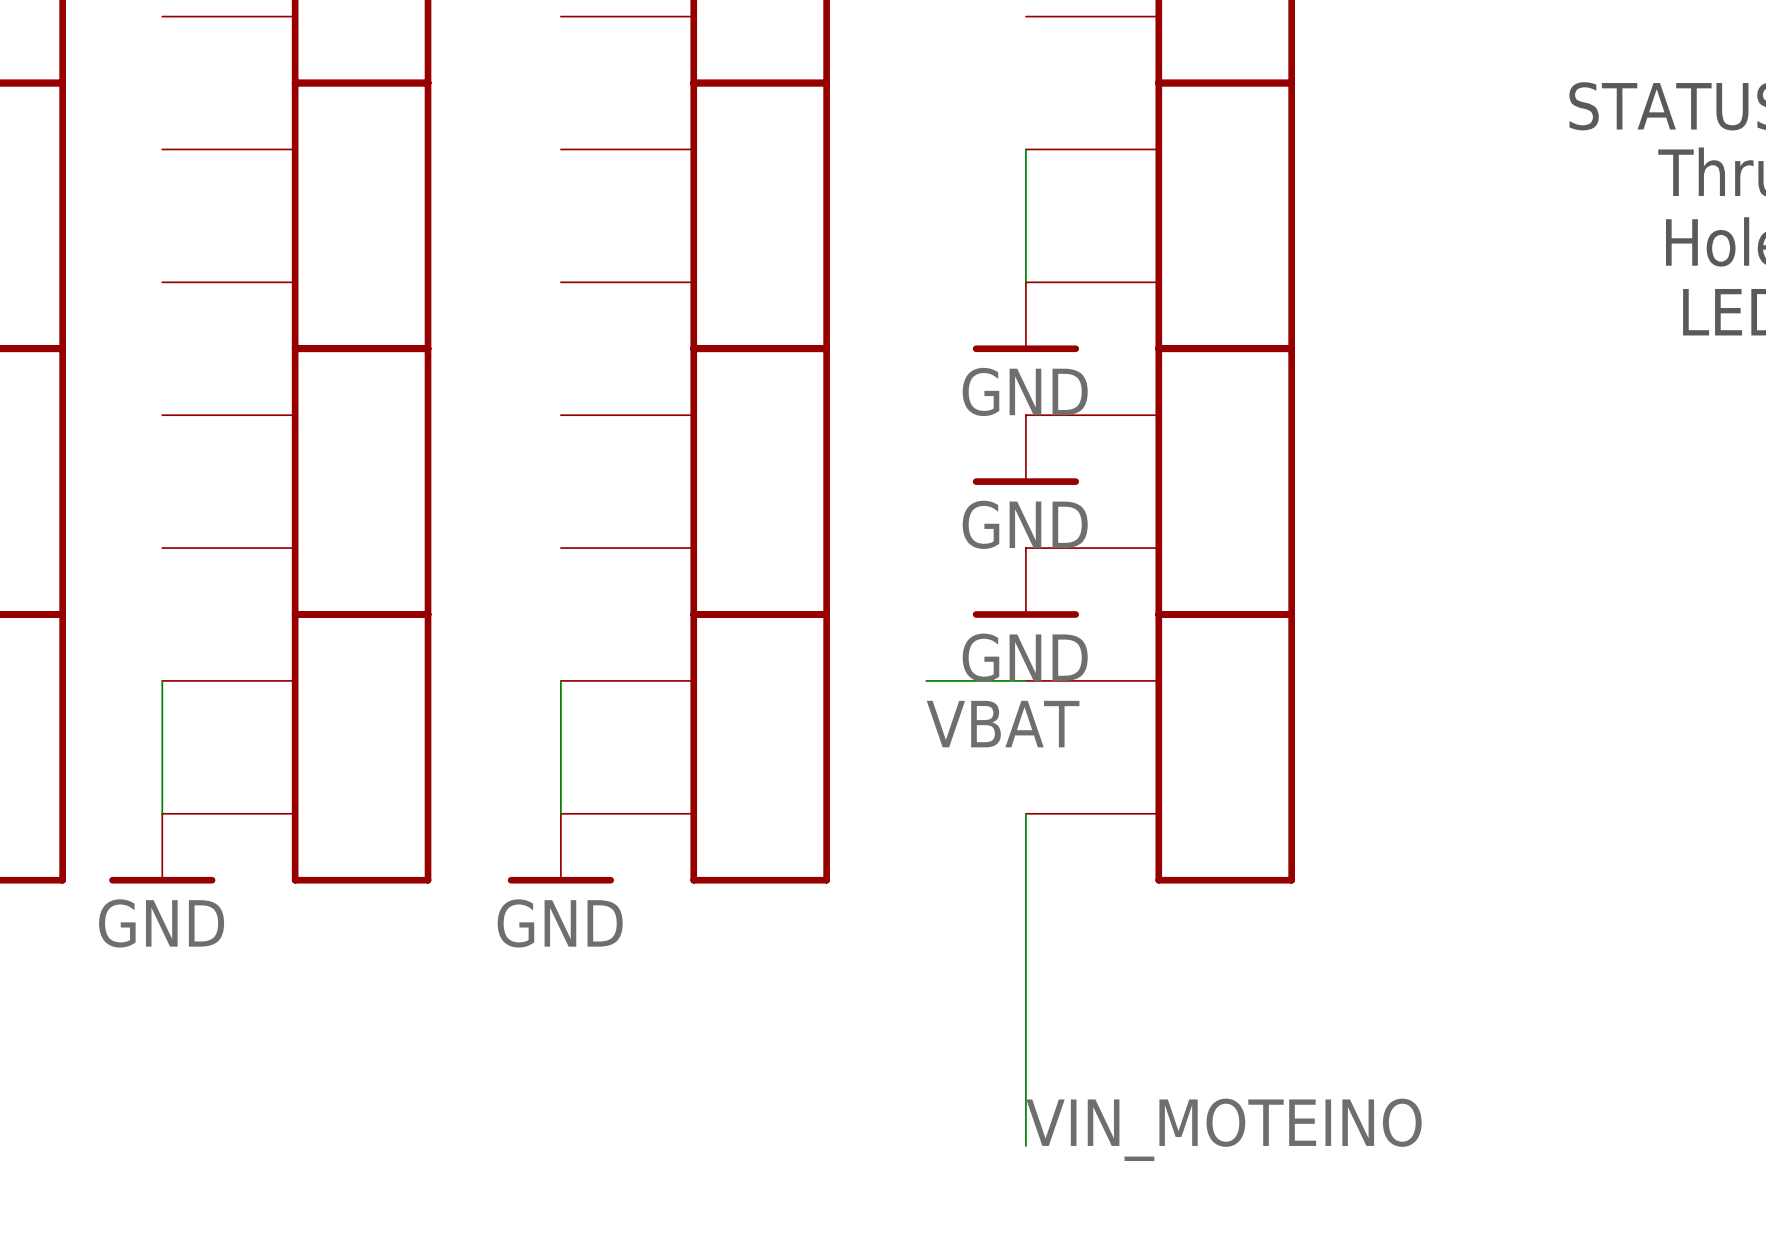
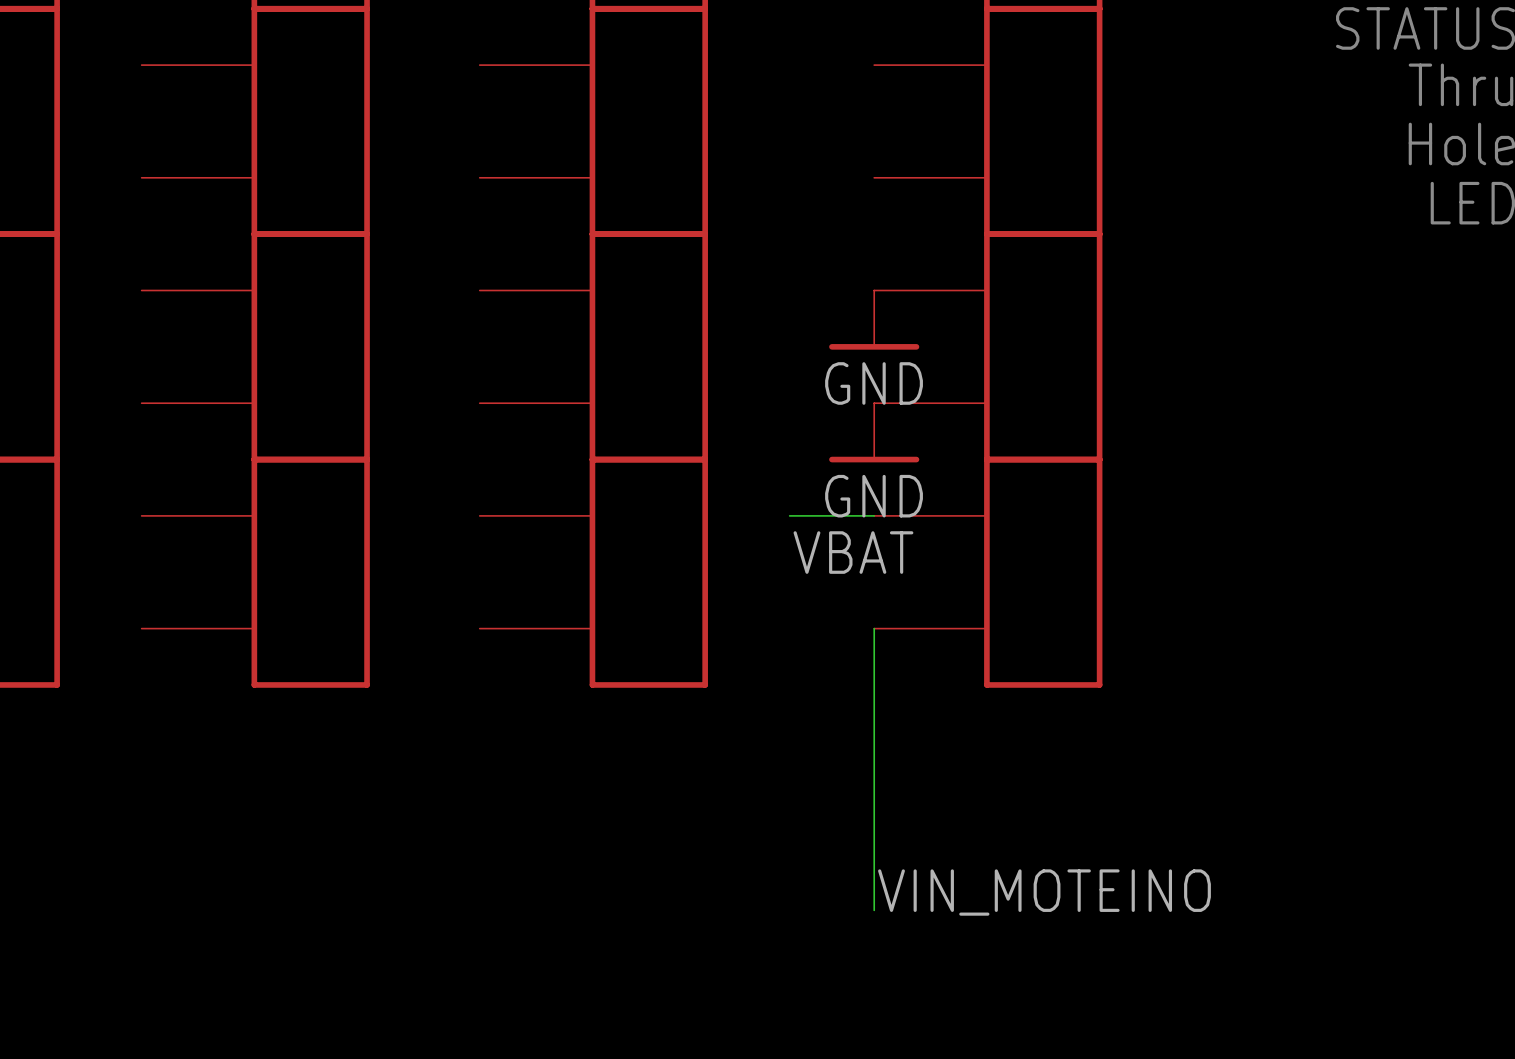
wire: (1025, 149) (1025, 282) -> none
power symbol: GND (1025, 317) -> none
wire: (162, 680) (162, 813) -> none
wire: (560, 680) (560, 813) -> none
power symbol: GND (162, 848) -> none
power symbol: GND (560, 848) -> none

